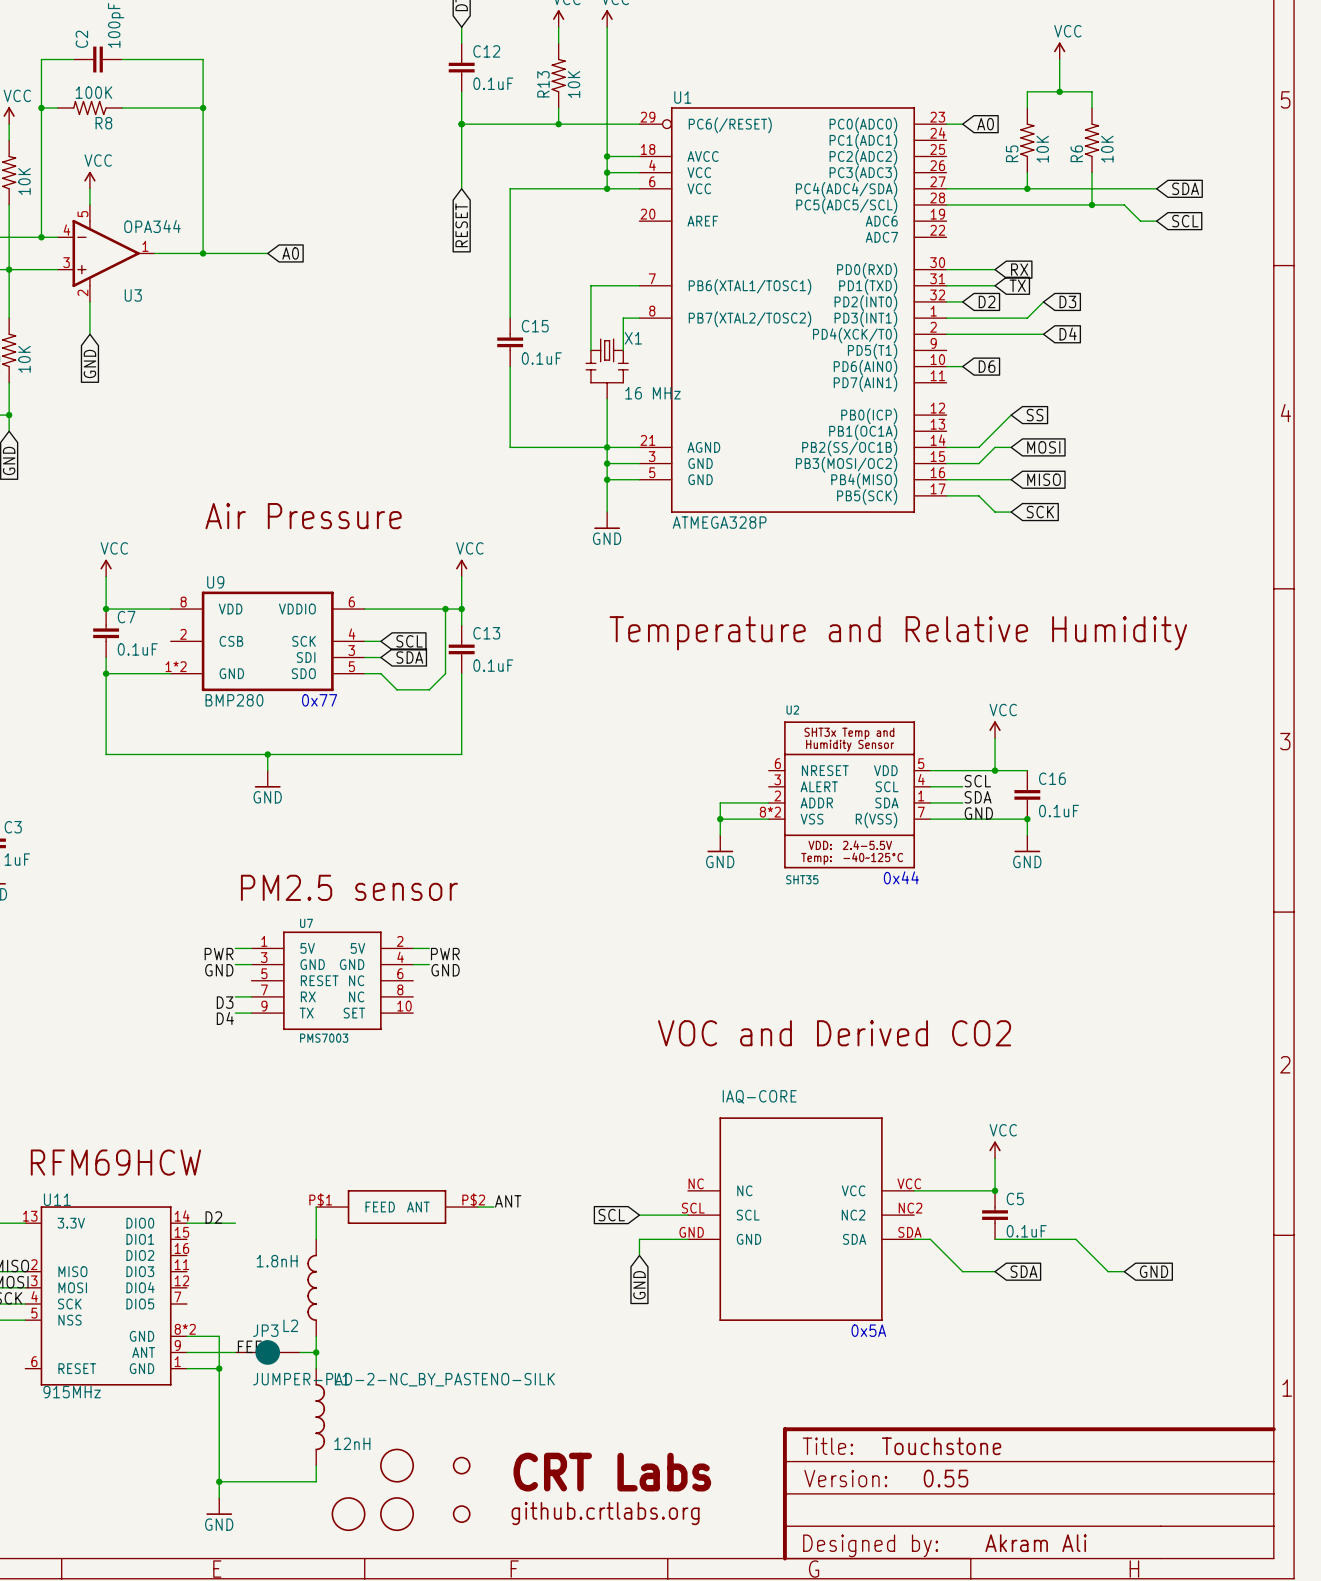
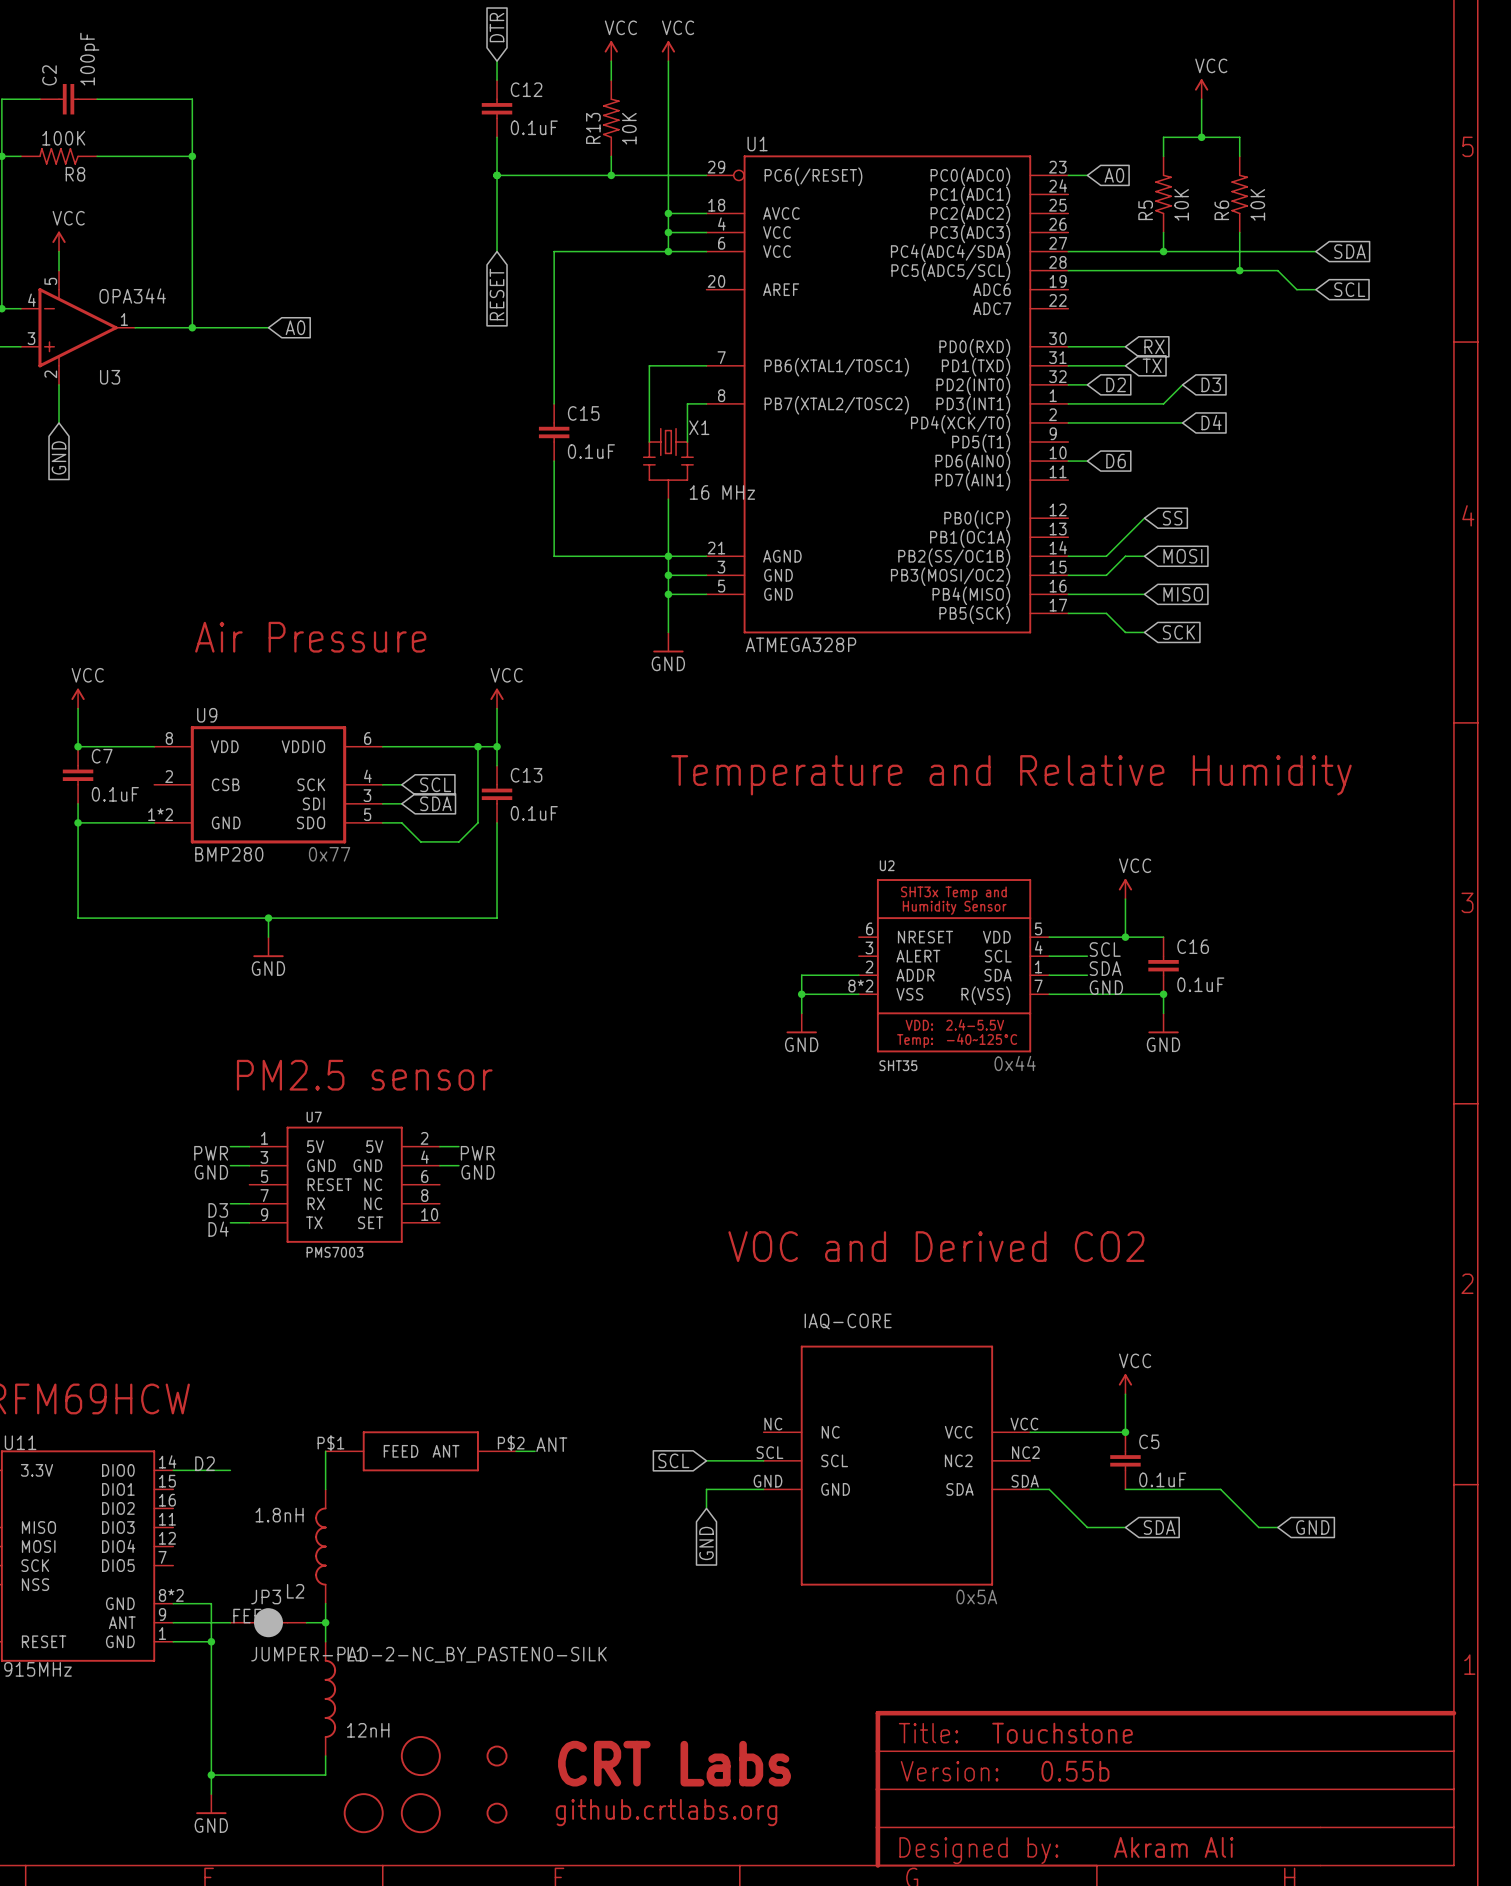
text: 0.55 (945, 1478) -> 0.55b (1075, 1771)

